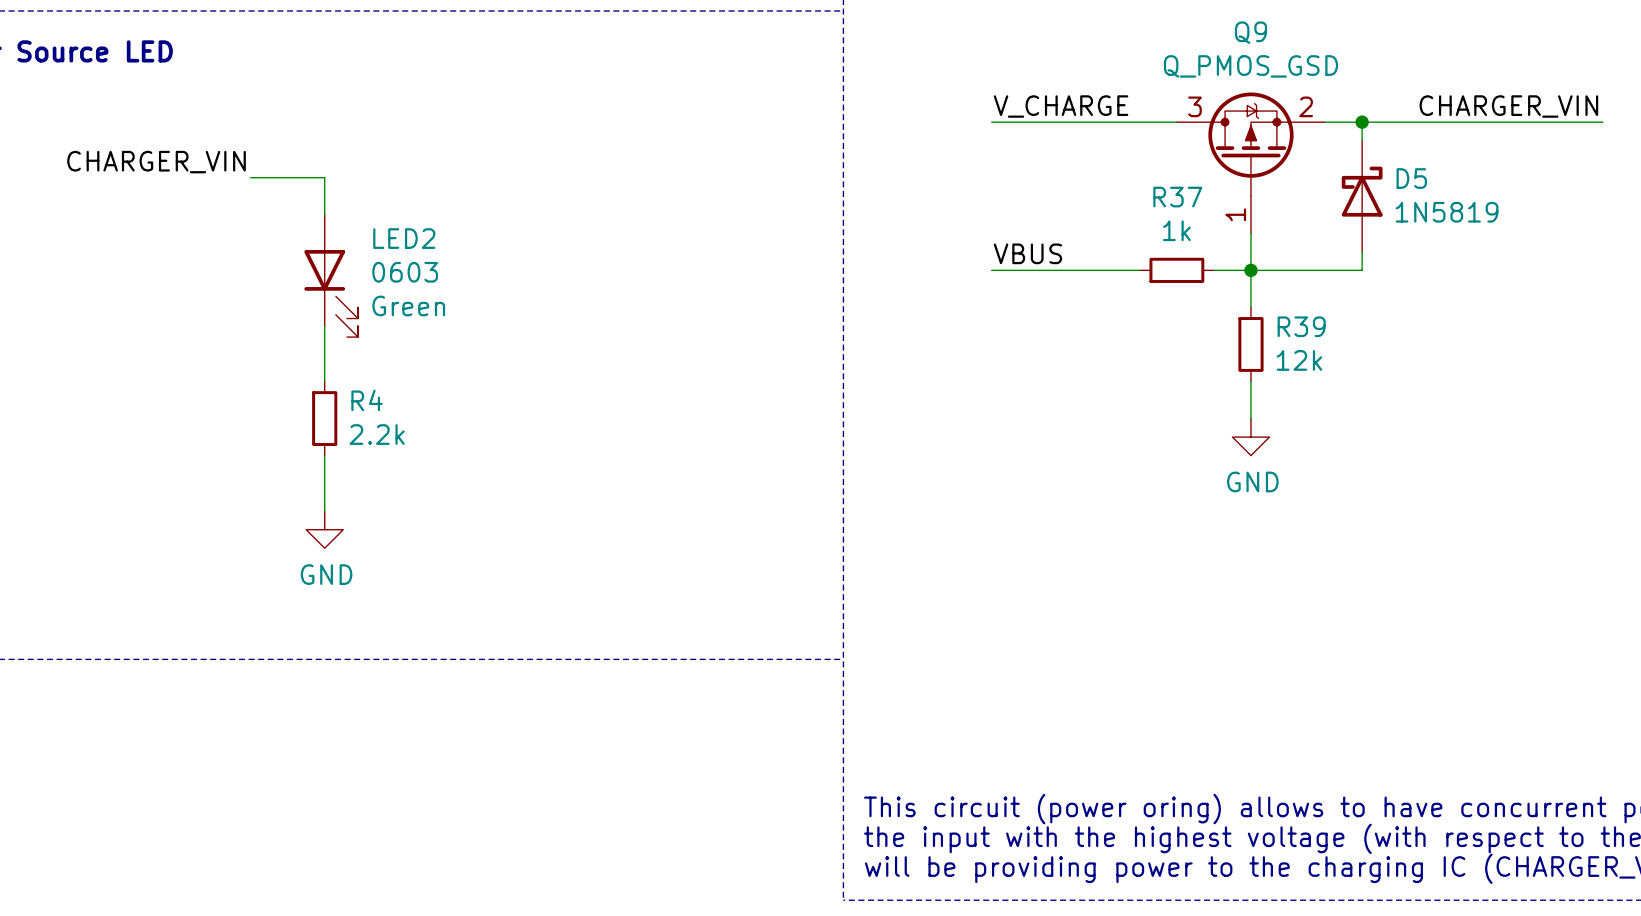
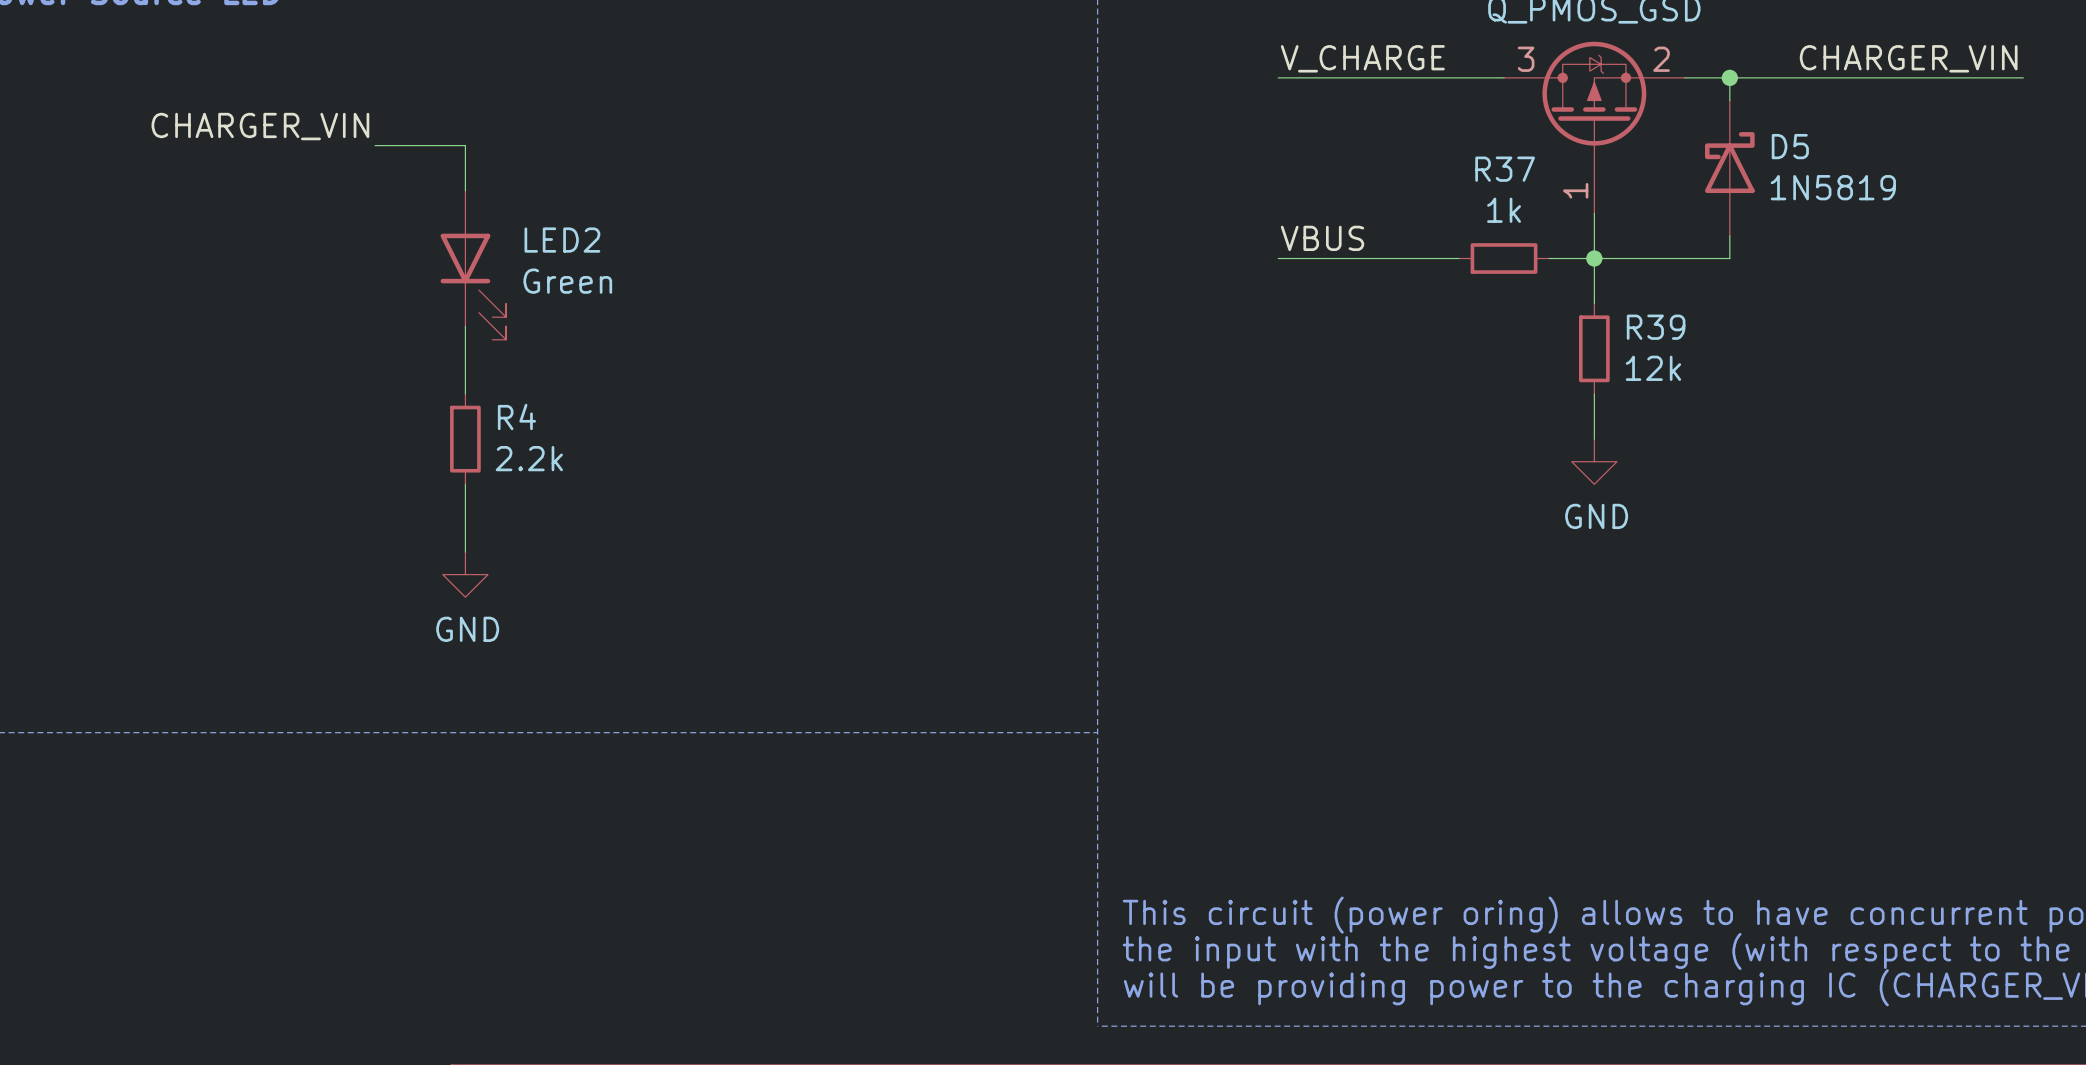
LED2 name position: LED2 (404, 238) -> LED2 (562, 240)
LED2 text: 0603 (405, 272) -> none
LED2 text position: Green (408, 305) -> Green (567, 281)

